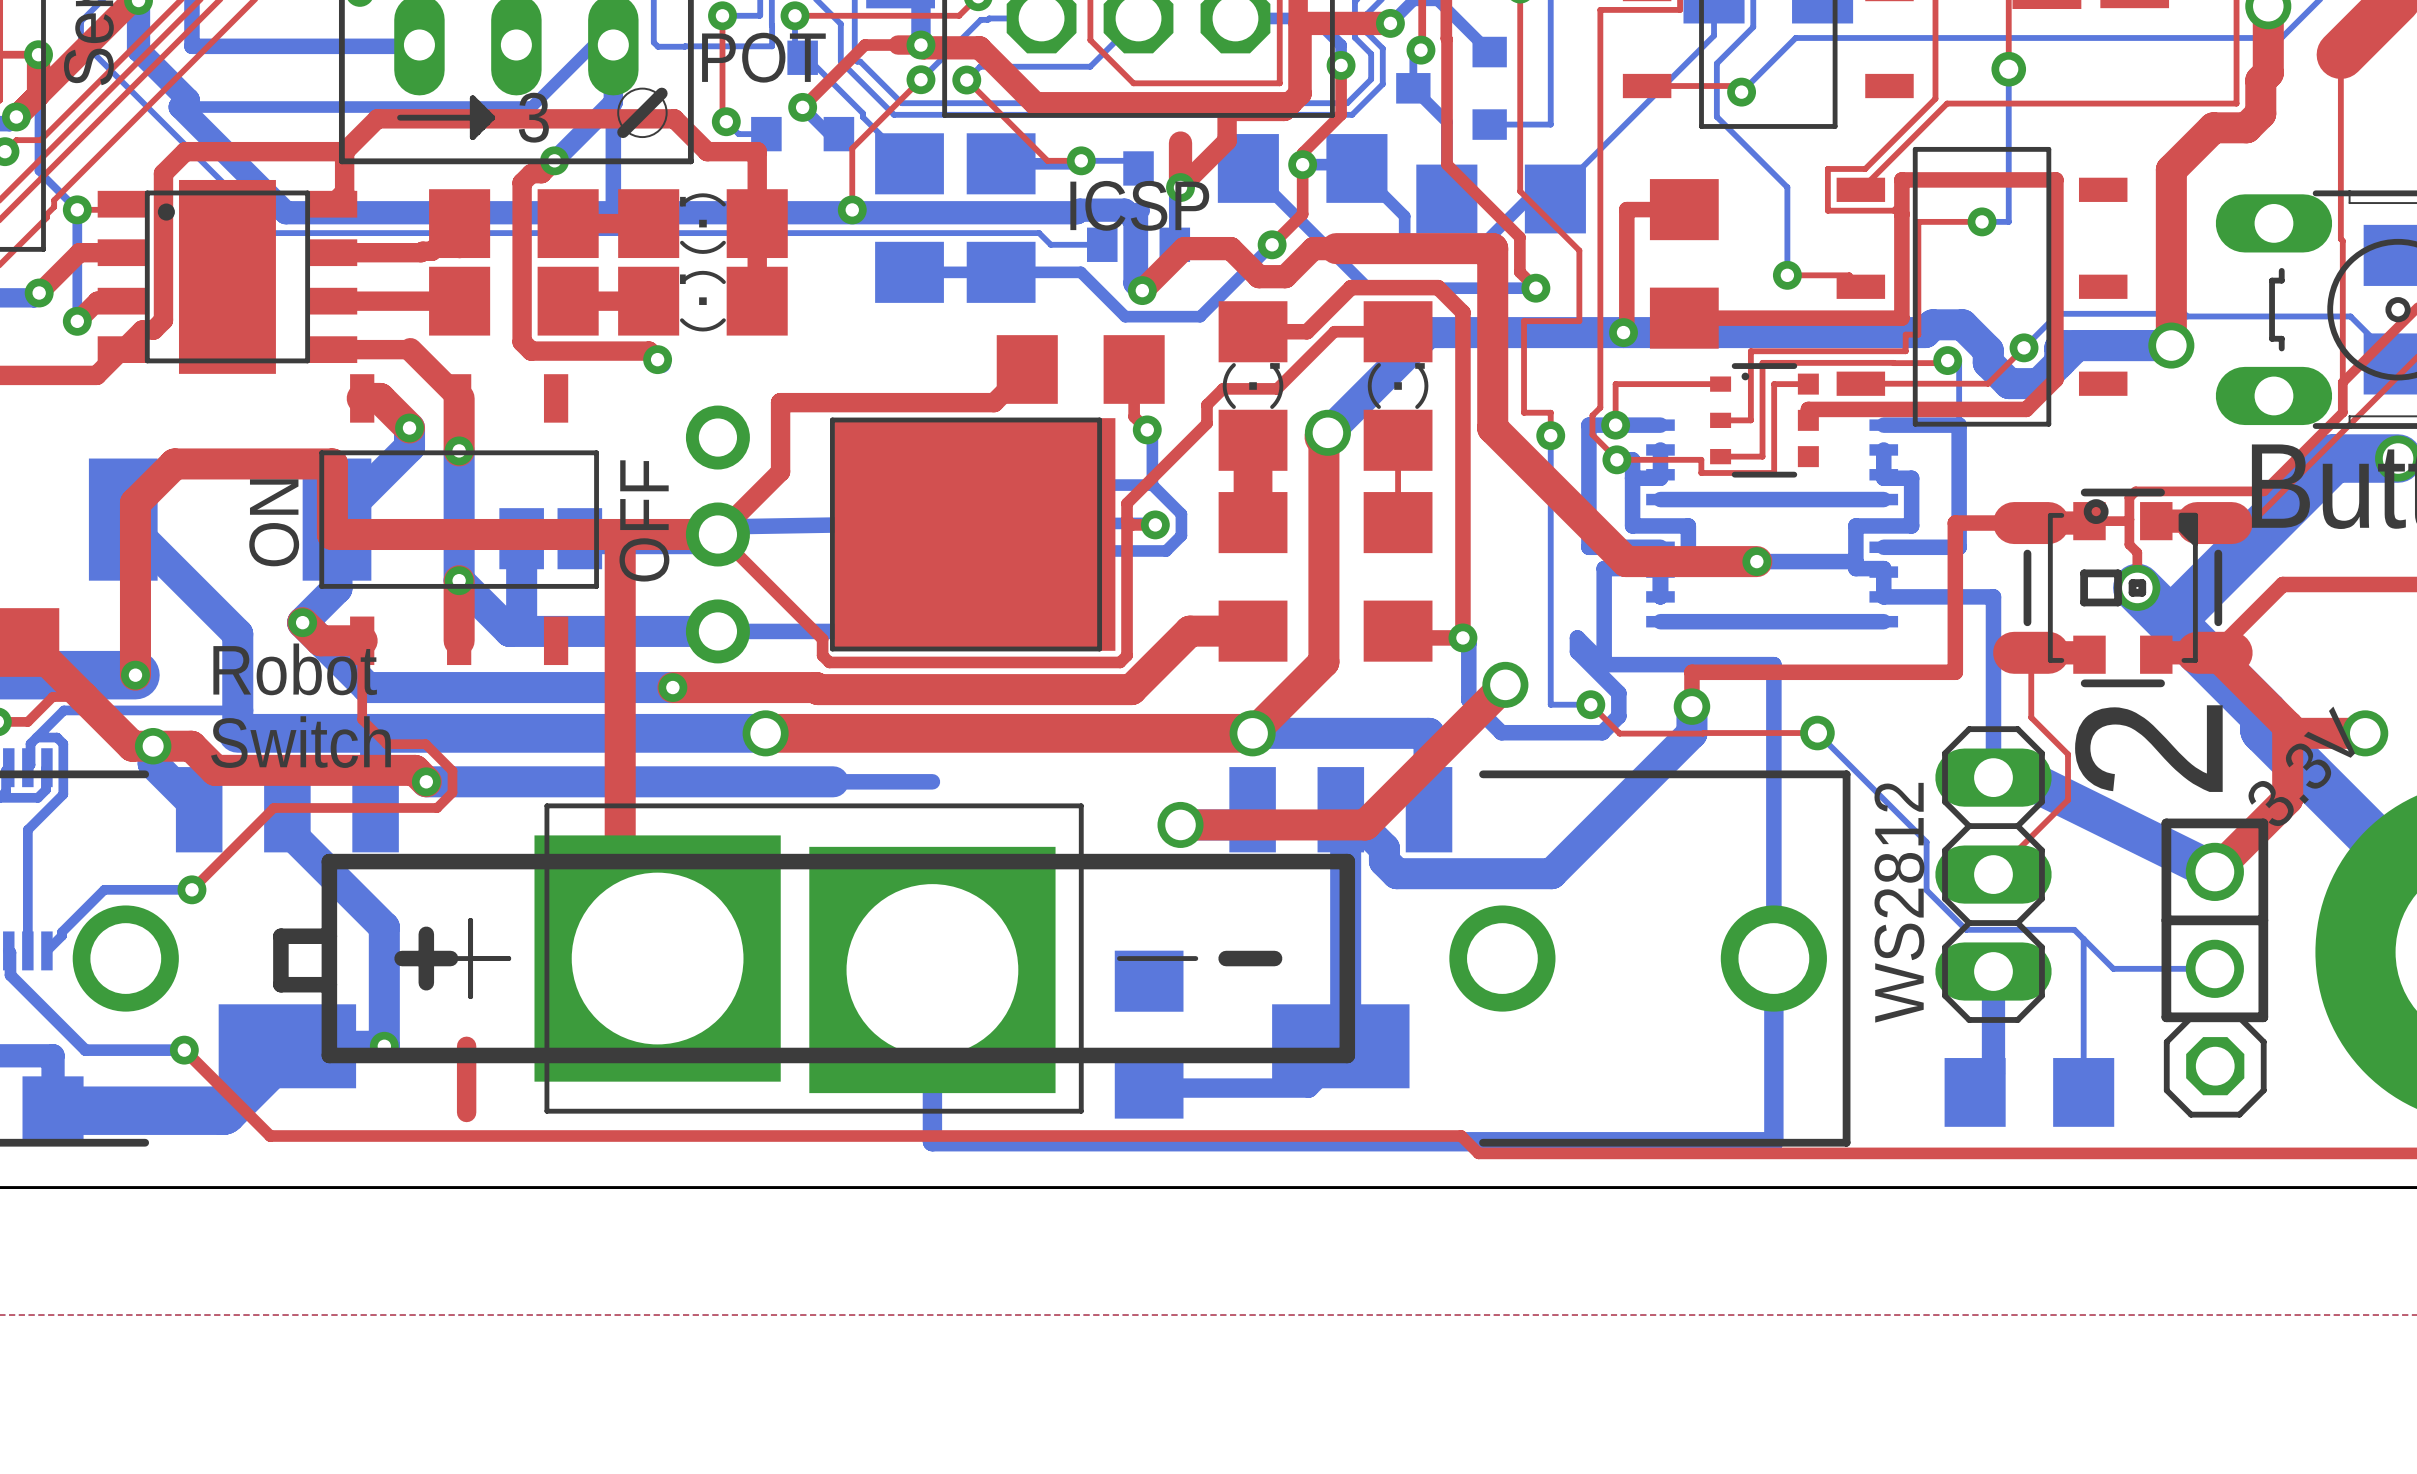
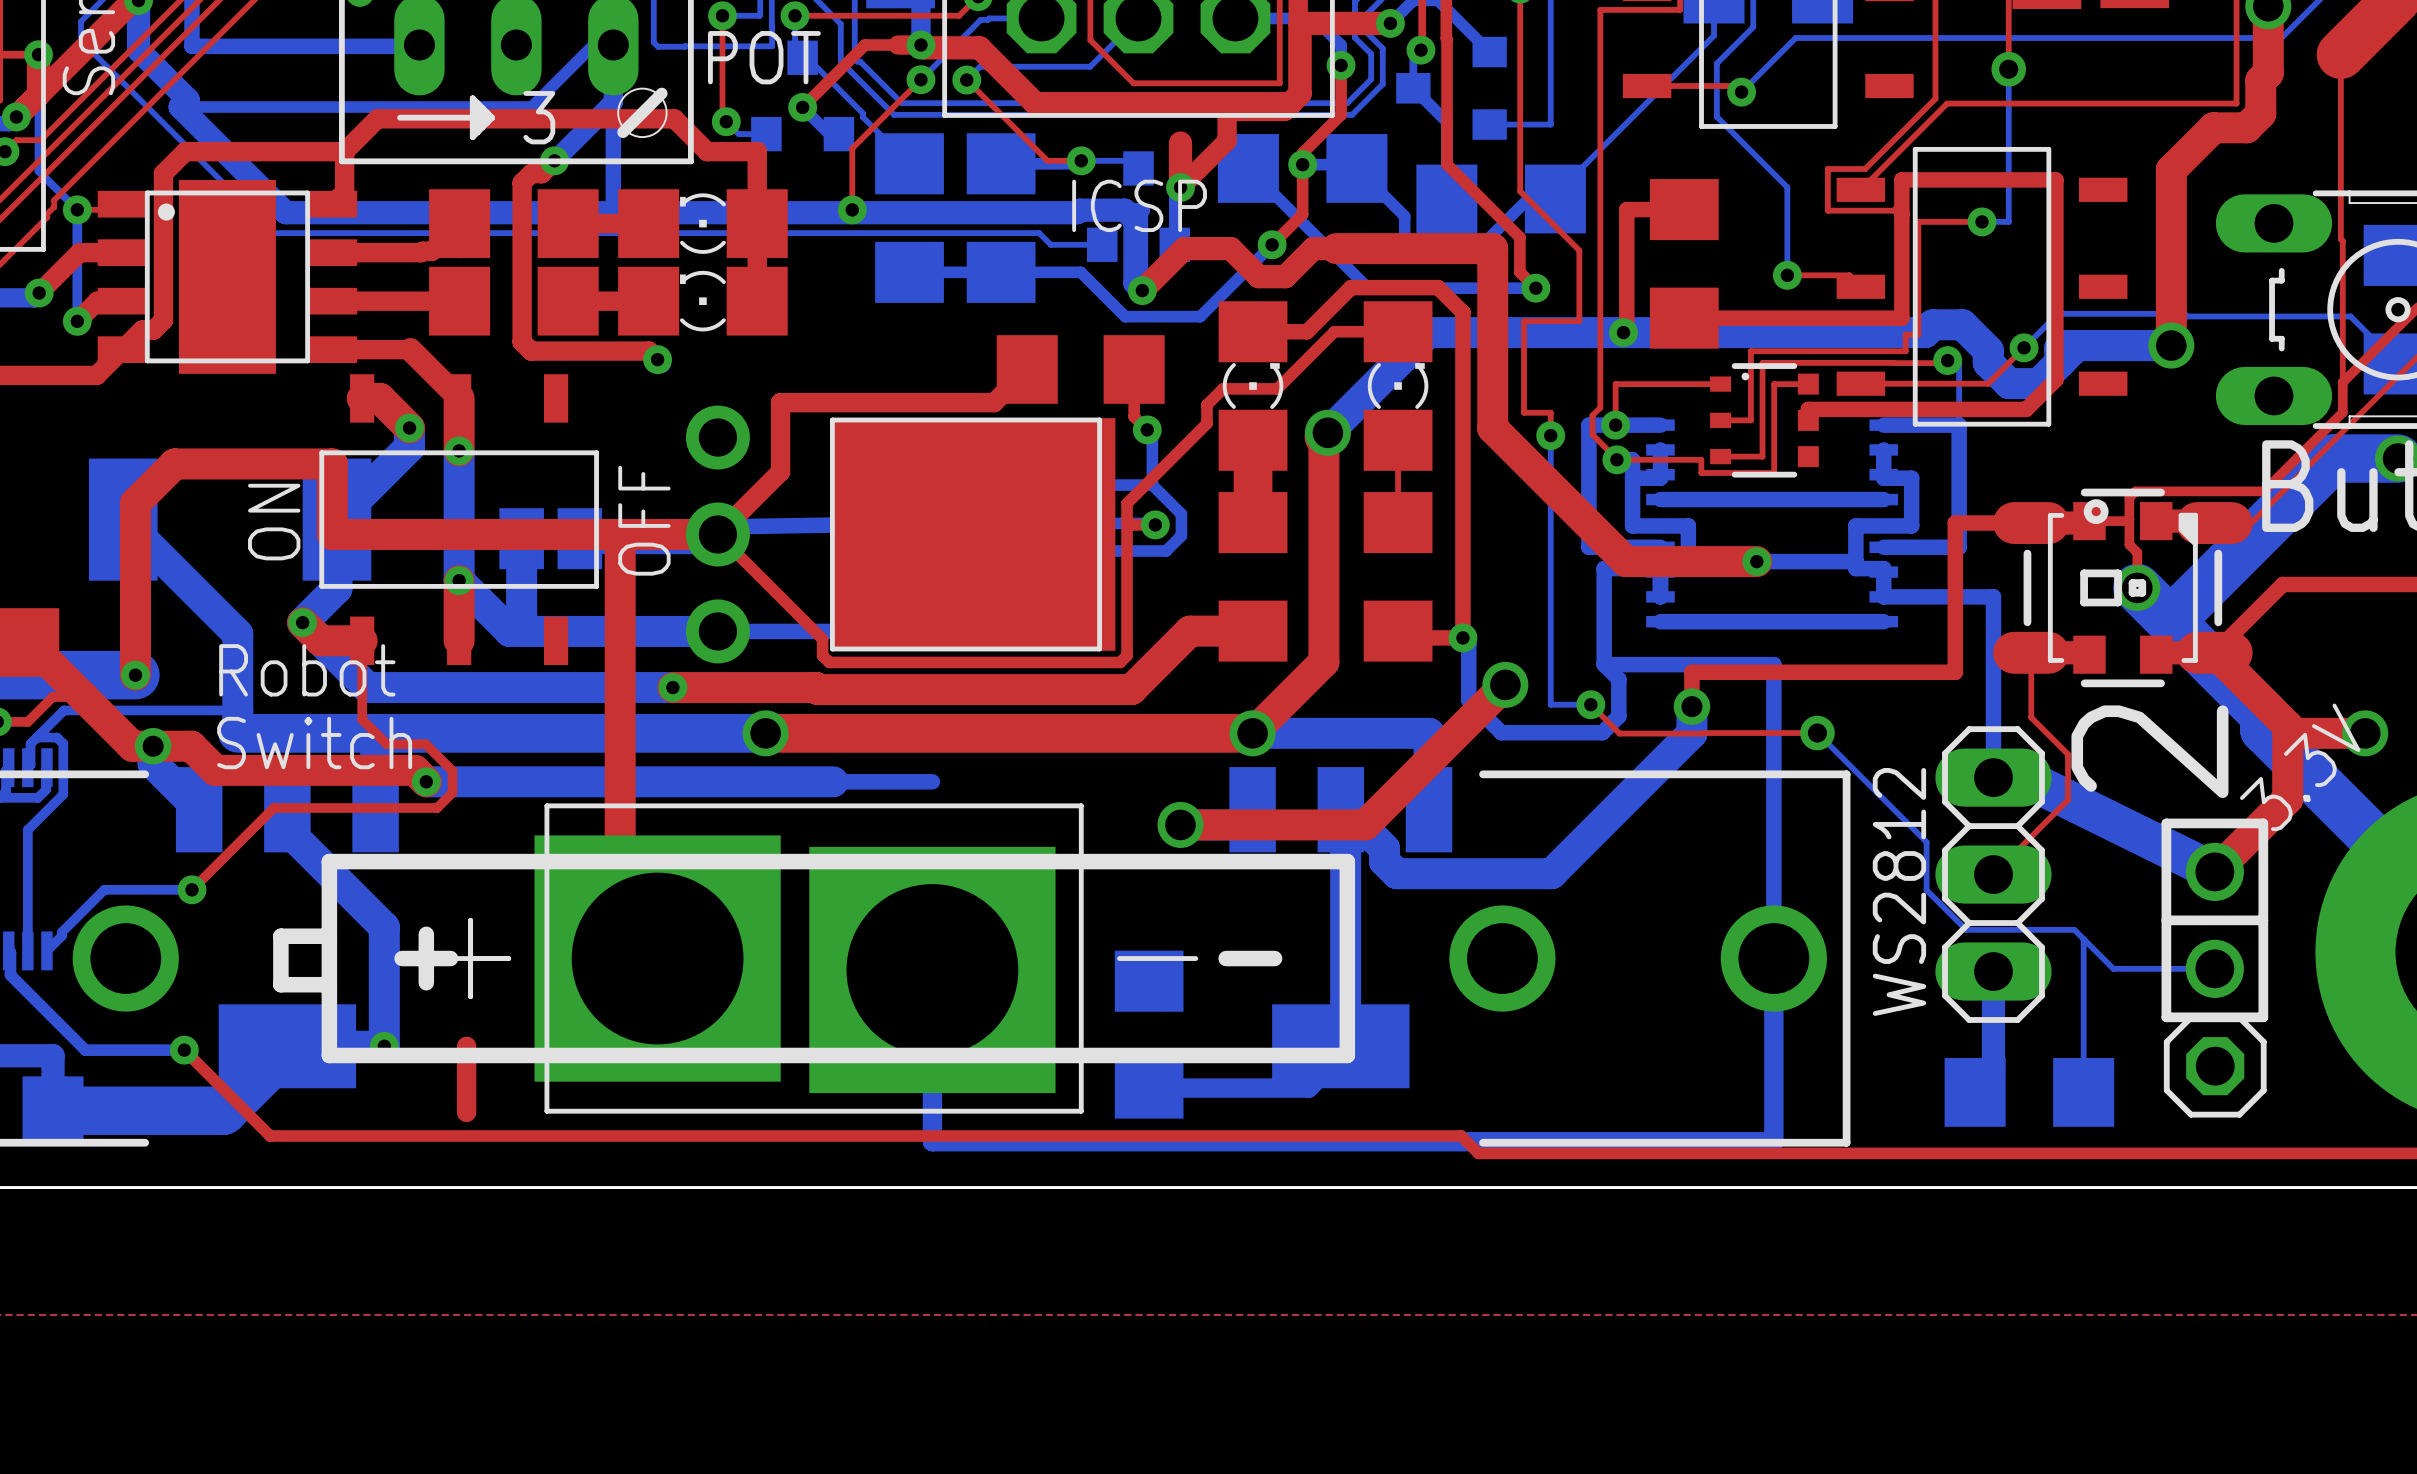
bottom track: (1604, 664) (1577, 637) (1577, 651) (1618, 693) -> (1604, 664) (1618, 679) (1618, 693)

